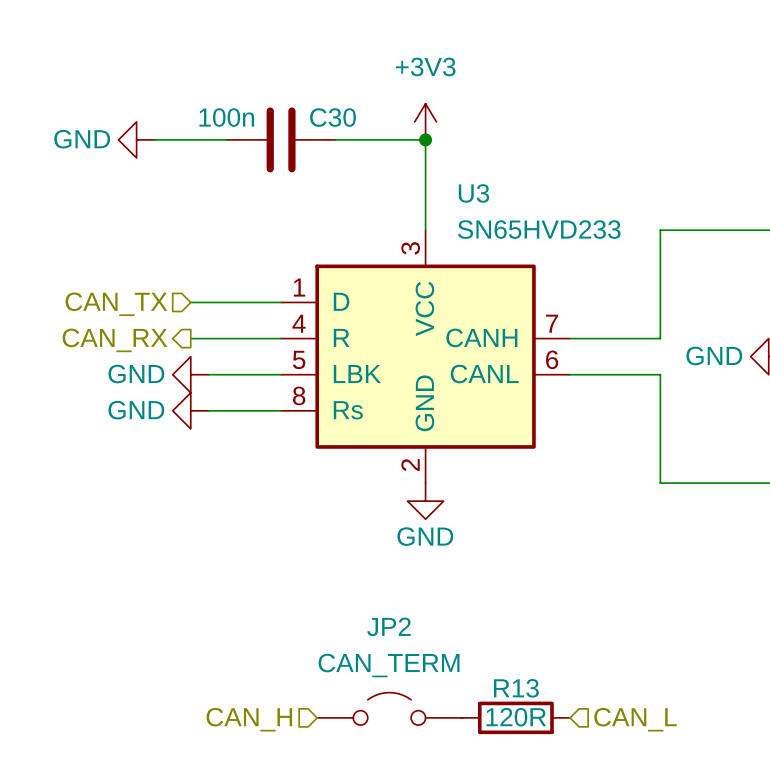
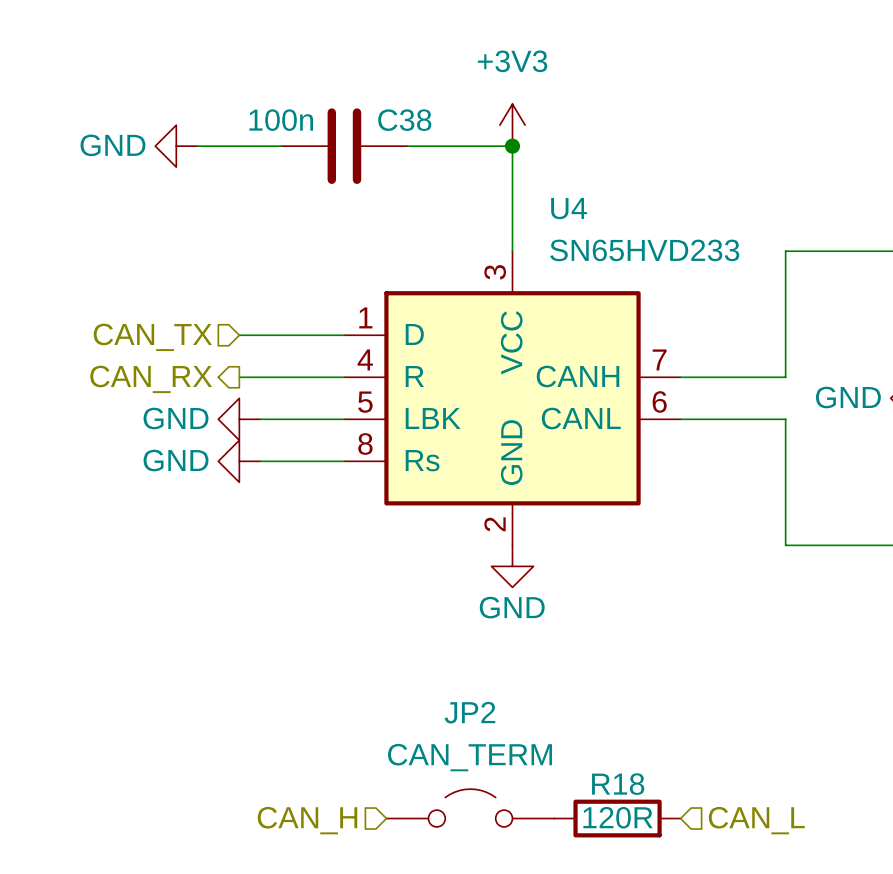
C30 name: C30 (333, 117) -> C38 (404, 120)
U3 name: U3 (473, 193) -> U4 (569, 208)
R13 name: R13 (516, 688) -> R18 (618, 784)

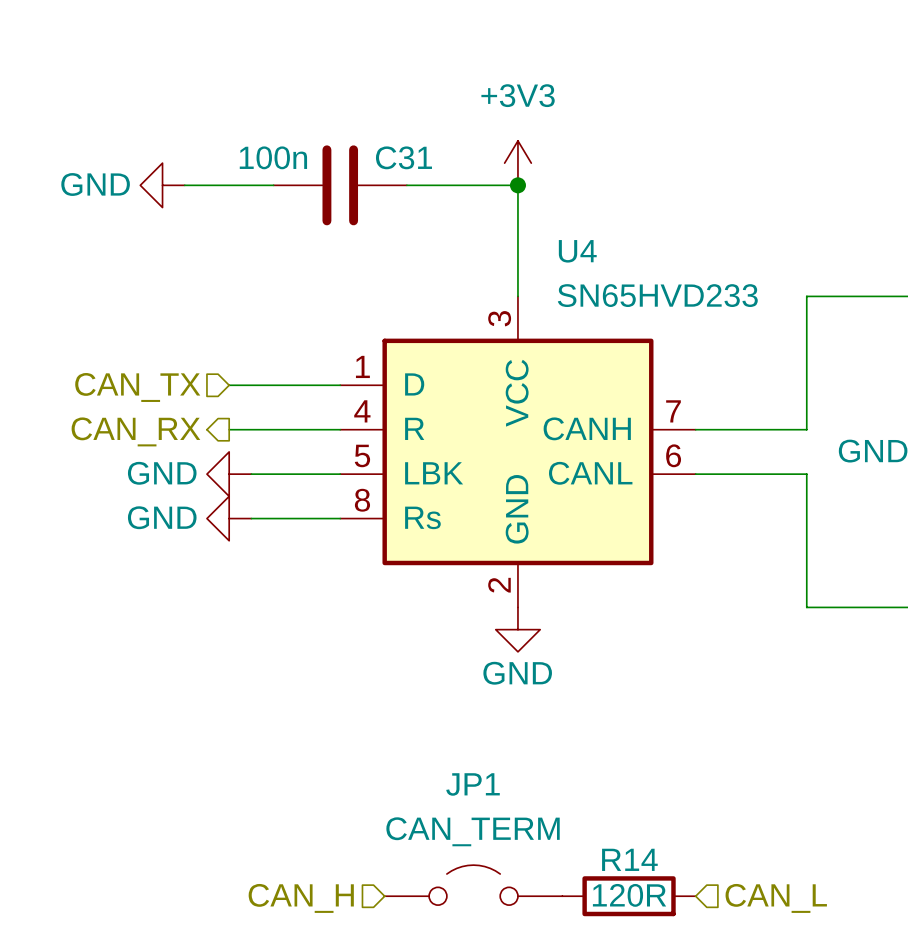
C38 name: C38 (404, 120) -> C31 (403, 157)
JP2 name: JP2 (469, 712) -> JP1 (473, 784)
R18 name: R18 (618, 784) -> R14 (629, 859)

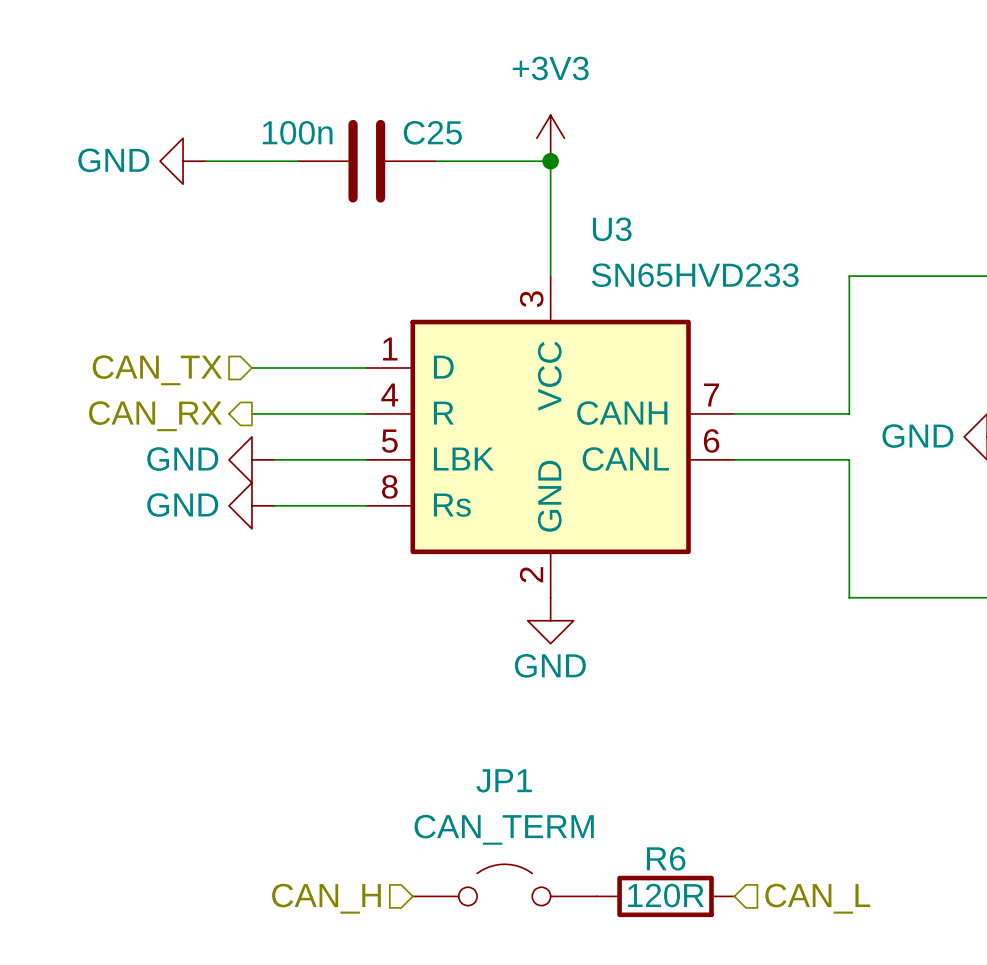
C31 name: C31 (403, 157) -> C25 (432, 132)
U4 name: U4 (577, 251) -> U3 (612, 229)
R14 name: R14 (629, 859) -> R6 (666, 858)

